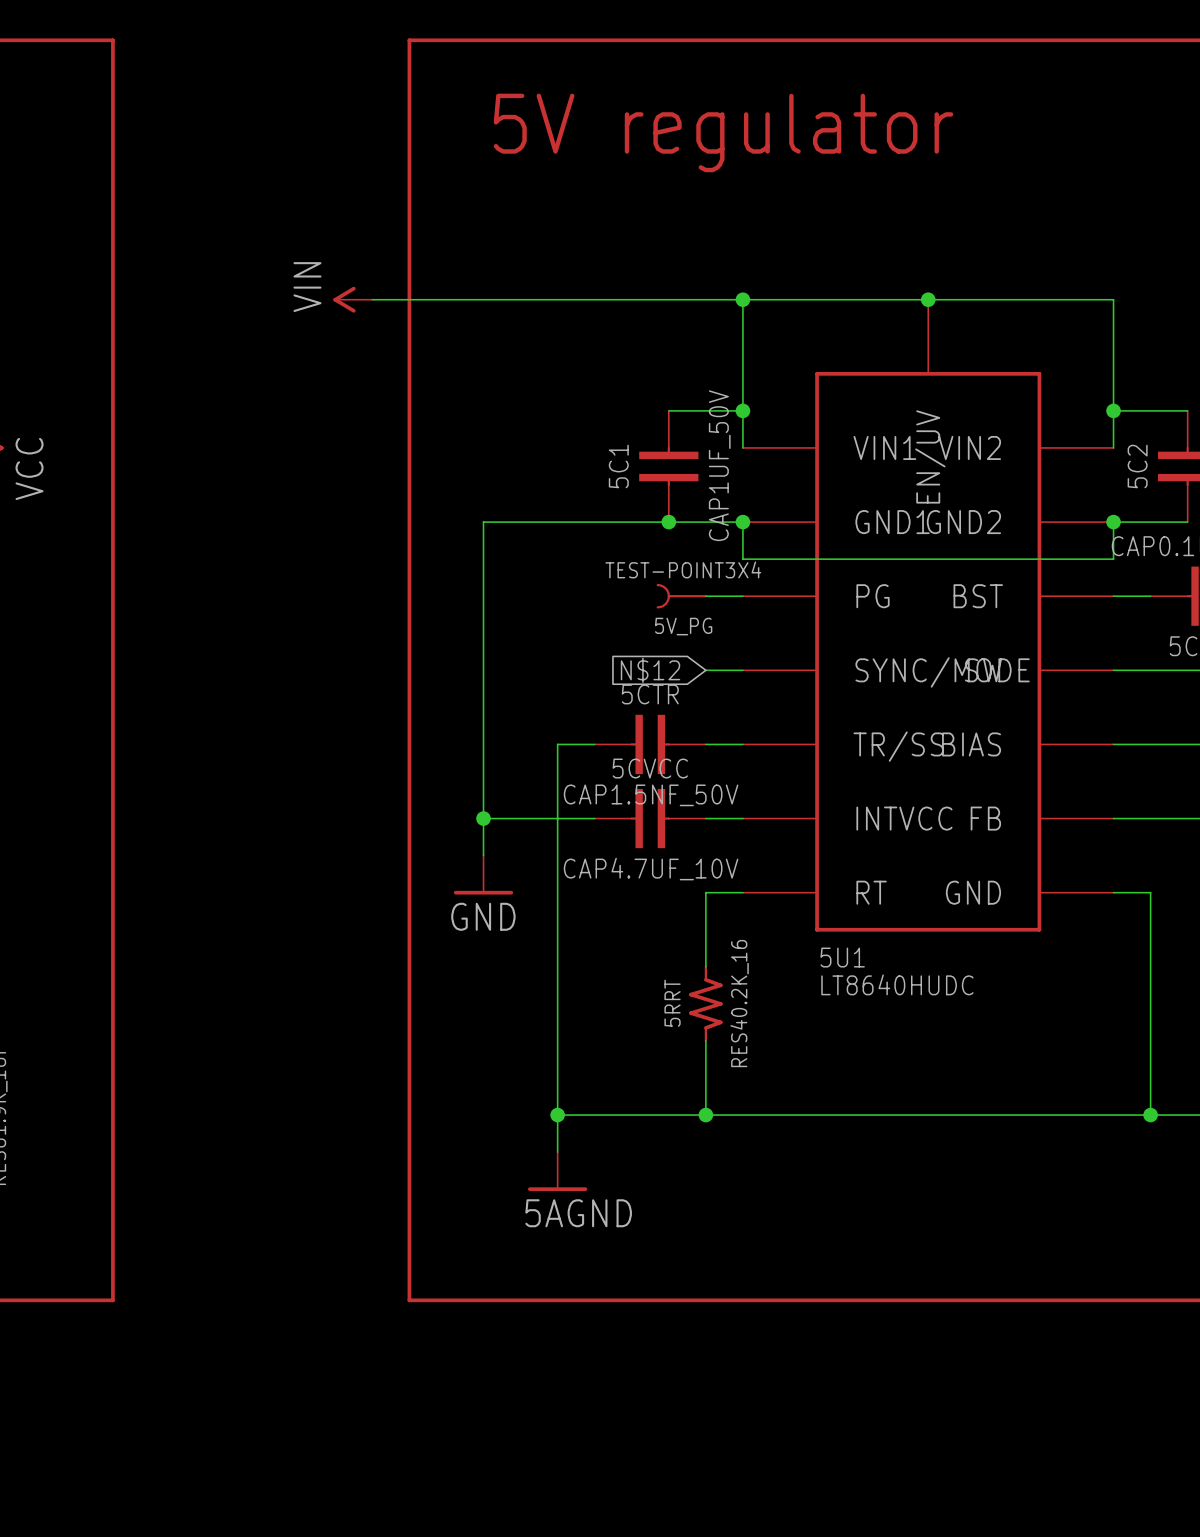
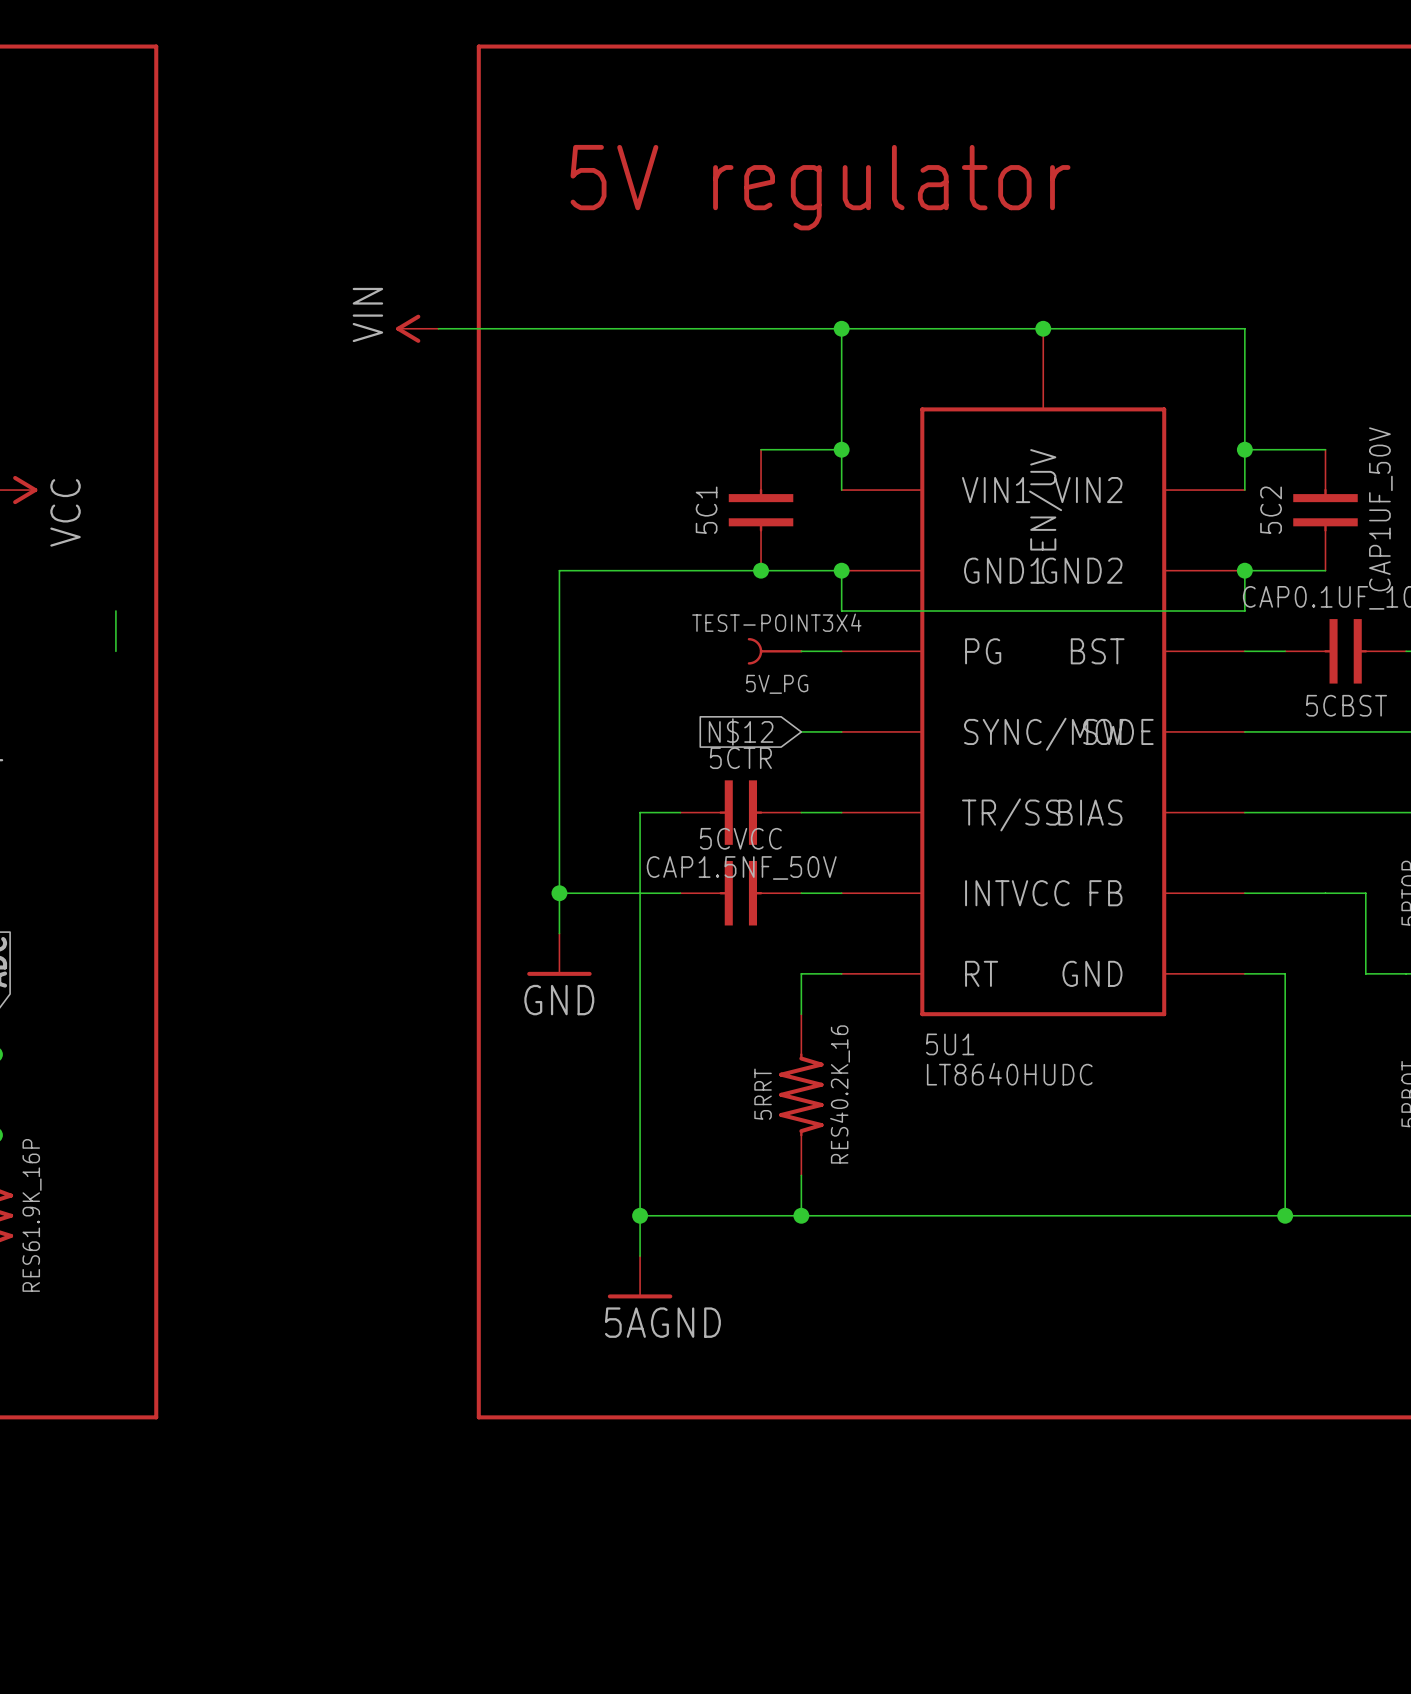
text position: 5V regulator (723, 132) -> 5V regulator (820, 187)
5C1 value: CAP1UF_50V (719, 465) -> none
wire: none -> (115, 611) (115, 651)
5CVCC value: CAP4.7UF_10V (651, 869) -> none
5RRT symbol: [689, 965, 723, 1043] -> [779, 1014, 824, 1176]

